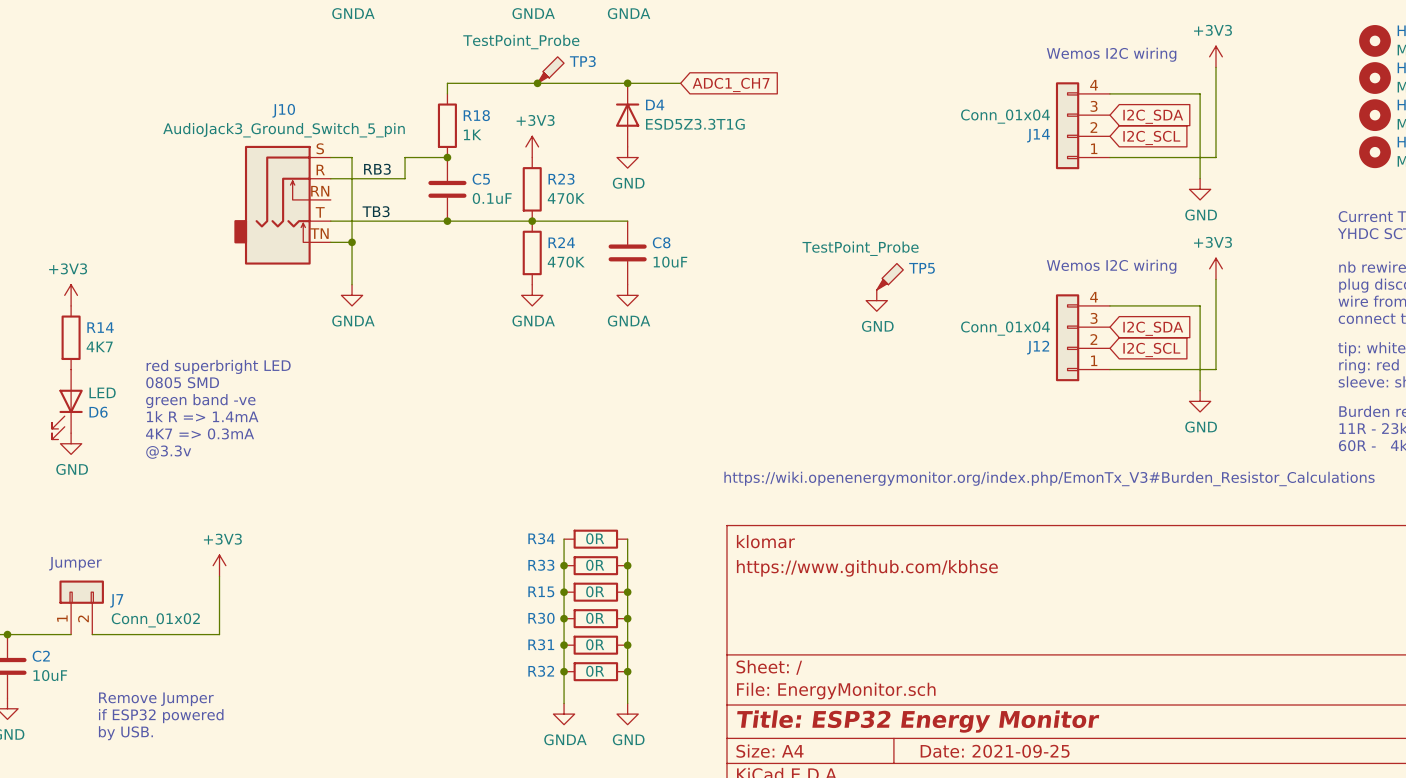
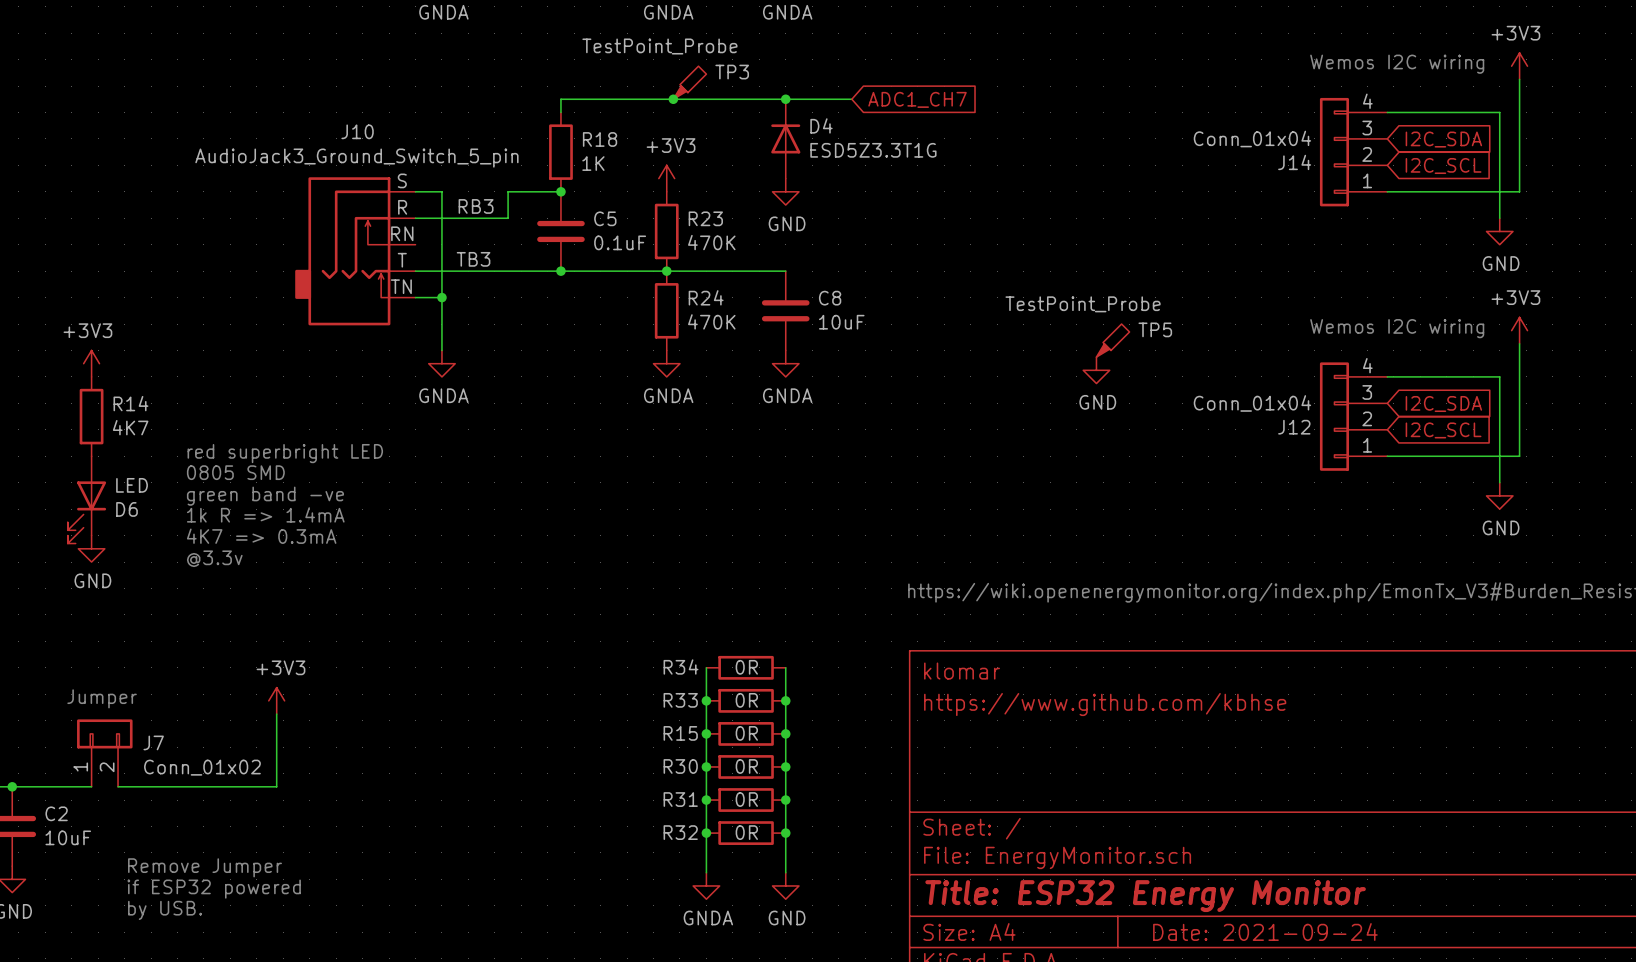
title block: Date: 2021-09-25 (995, 751) -> Date: 2021-09-24 (1265, 932)

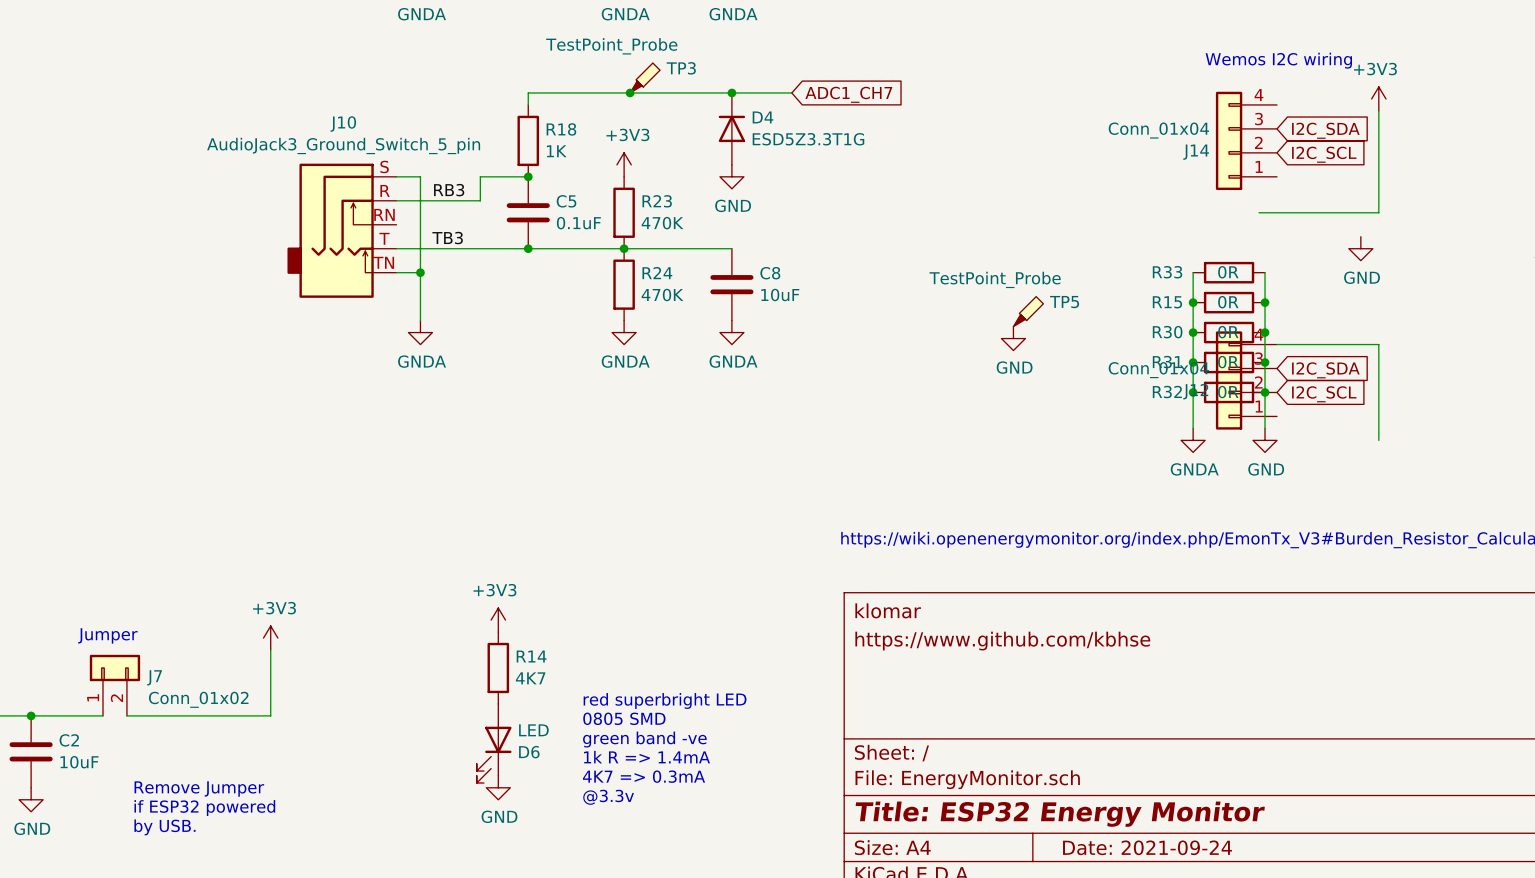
power symbol position: +3V3 (1519, 66) -> +3V3 (1378, 98)
wire: (1519, 79) (1519, 191) (1387, 191) -> none
wire: (1387, 112) (1499, 112) (1499, 119) -> none
wire: none -> (1378, 200) (1378, 212) (1259, 212)
power symbol position: GND (1499, 231) -> GND (1360, 248)
wire: none -> (1193, 272) (1193, 428)
wire: none -> (1265, 272) (1265, 428)
text: Wemos I2C wiring (1397, 328) -> none
junction: none -> (1193, 302)
junction: none -> (1265, 302)
power symbol: +3V3 (1519, 330) -> none
wire: (1519, 343) (1519, 456) (1387, 456) -> none
power symbol: +3V3 (91, 363) -> none
junction: none -> (1193, 332)
junction: none -> (1265, 332)
junction: none -> (1193, 362)
junction: none -> (1265, 362)
R14 position: (91, 416) -> (498, 668)
junction: none -> (1193, 392)
junction: none -> (1265, 392)
text: red superbright LED (285, 453) -> none
text: 0805 SMD (235, 472) -> none
power symbol: none -> GNDA (1193, 440)
power symbol: none -> GND (1265, 440)
power symbol: GND (1499, 495) -> none
text: green band -ve (265, 496) -> none
D6 position: (86, 499) -> (494, 743)
text: 1k R => 1.4mA (265, 514) -> none
text: 4K7 => 0.3mA (261, 536) -> none
power symbol: GND (91, 548) -> none
text: @3.3v (214, 558) -> none
wire: (706, 667) (706, 872) -> none
R34: 0R (746, 667) -> none
wire: (785, 667) (785, 872) -> none
power symbol: none -> +3V3 (498, 620)
junction: (706, 700) -> none
R33 position: (746, 700) -> (1229, 272)
junction: (785, 700) -> none
junction: (706, 733) -> none
R15 position: (746, 733) -> (1229, 302)
junction: (785, 733) -> none
junction: (706, 766) -> none
R30 position: (746, 766) -> (1229, 332)
junction: (785, 766) -> none
text: none -> red superbright LED (665, 700)
text: none -> 0805 SMD (624, 718)
junction: (706, 800) -> none
R31 position: (746, 800) -> (1229, 362)
junction: (785, 800) -> none
text: none -> green band -ve (644, 739)
text: none -> 1k R => 1.4mA (646, 757)
junction: (706, 833) -> none
R32 position: (746, 833) -> (1229, 392)
junction: (785, 833) -> none
text: none -> 4K7 => 0.3mA (644, 776)
text: none -> @3.3v (608, 797)
power symbol: GNDA (706, 885) -> none
power symbol position: GND (785, 885) -> GND (498, 787)

